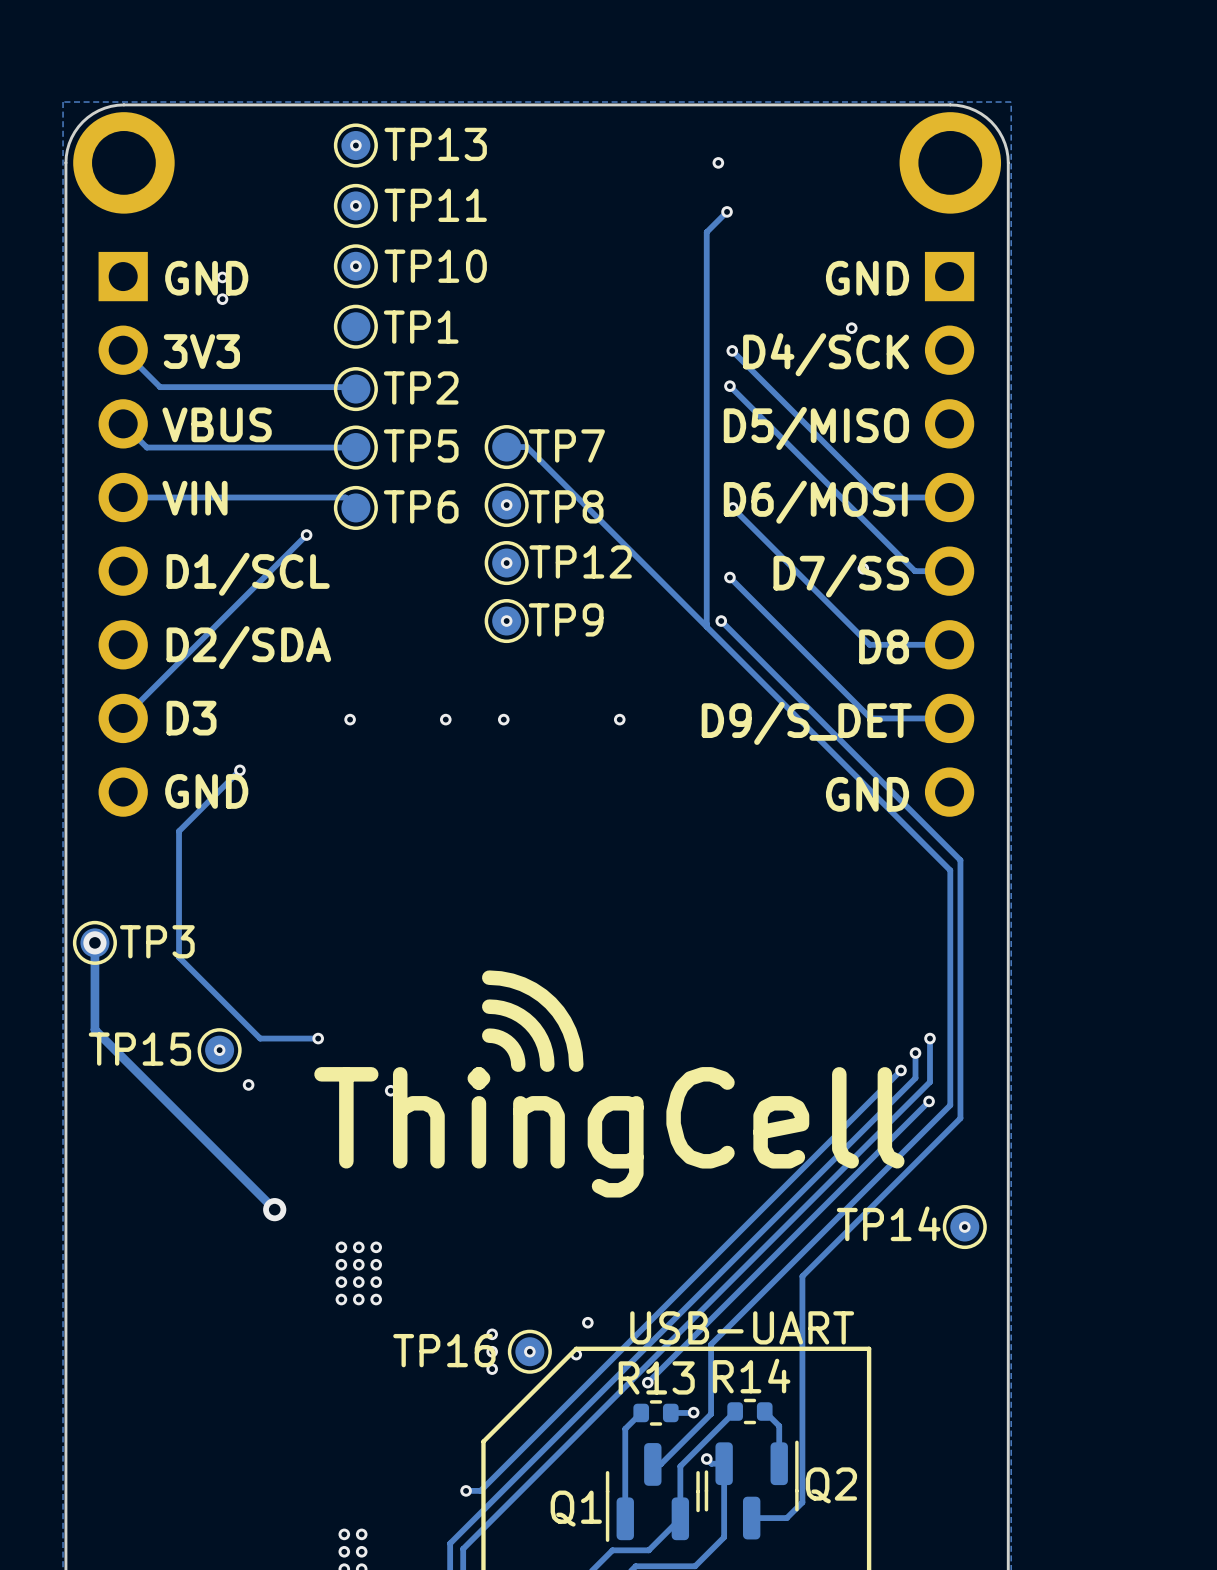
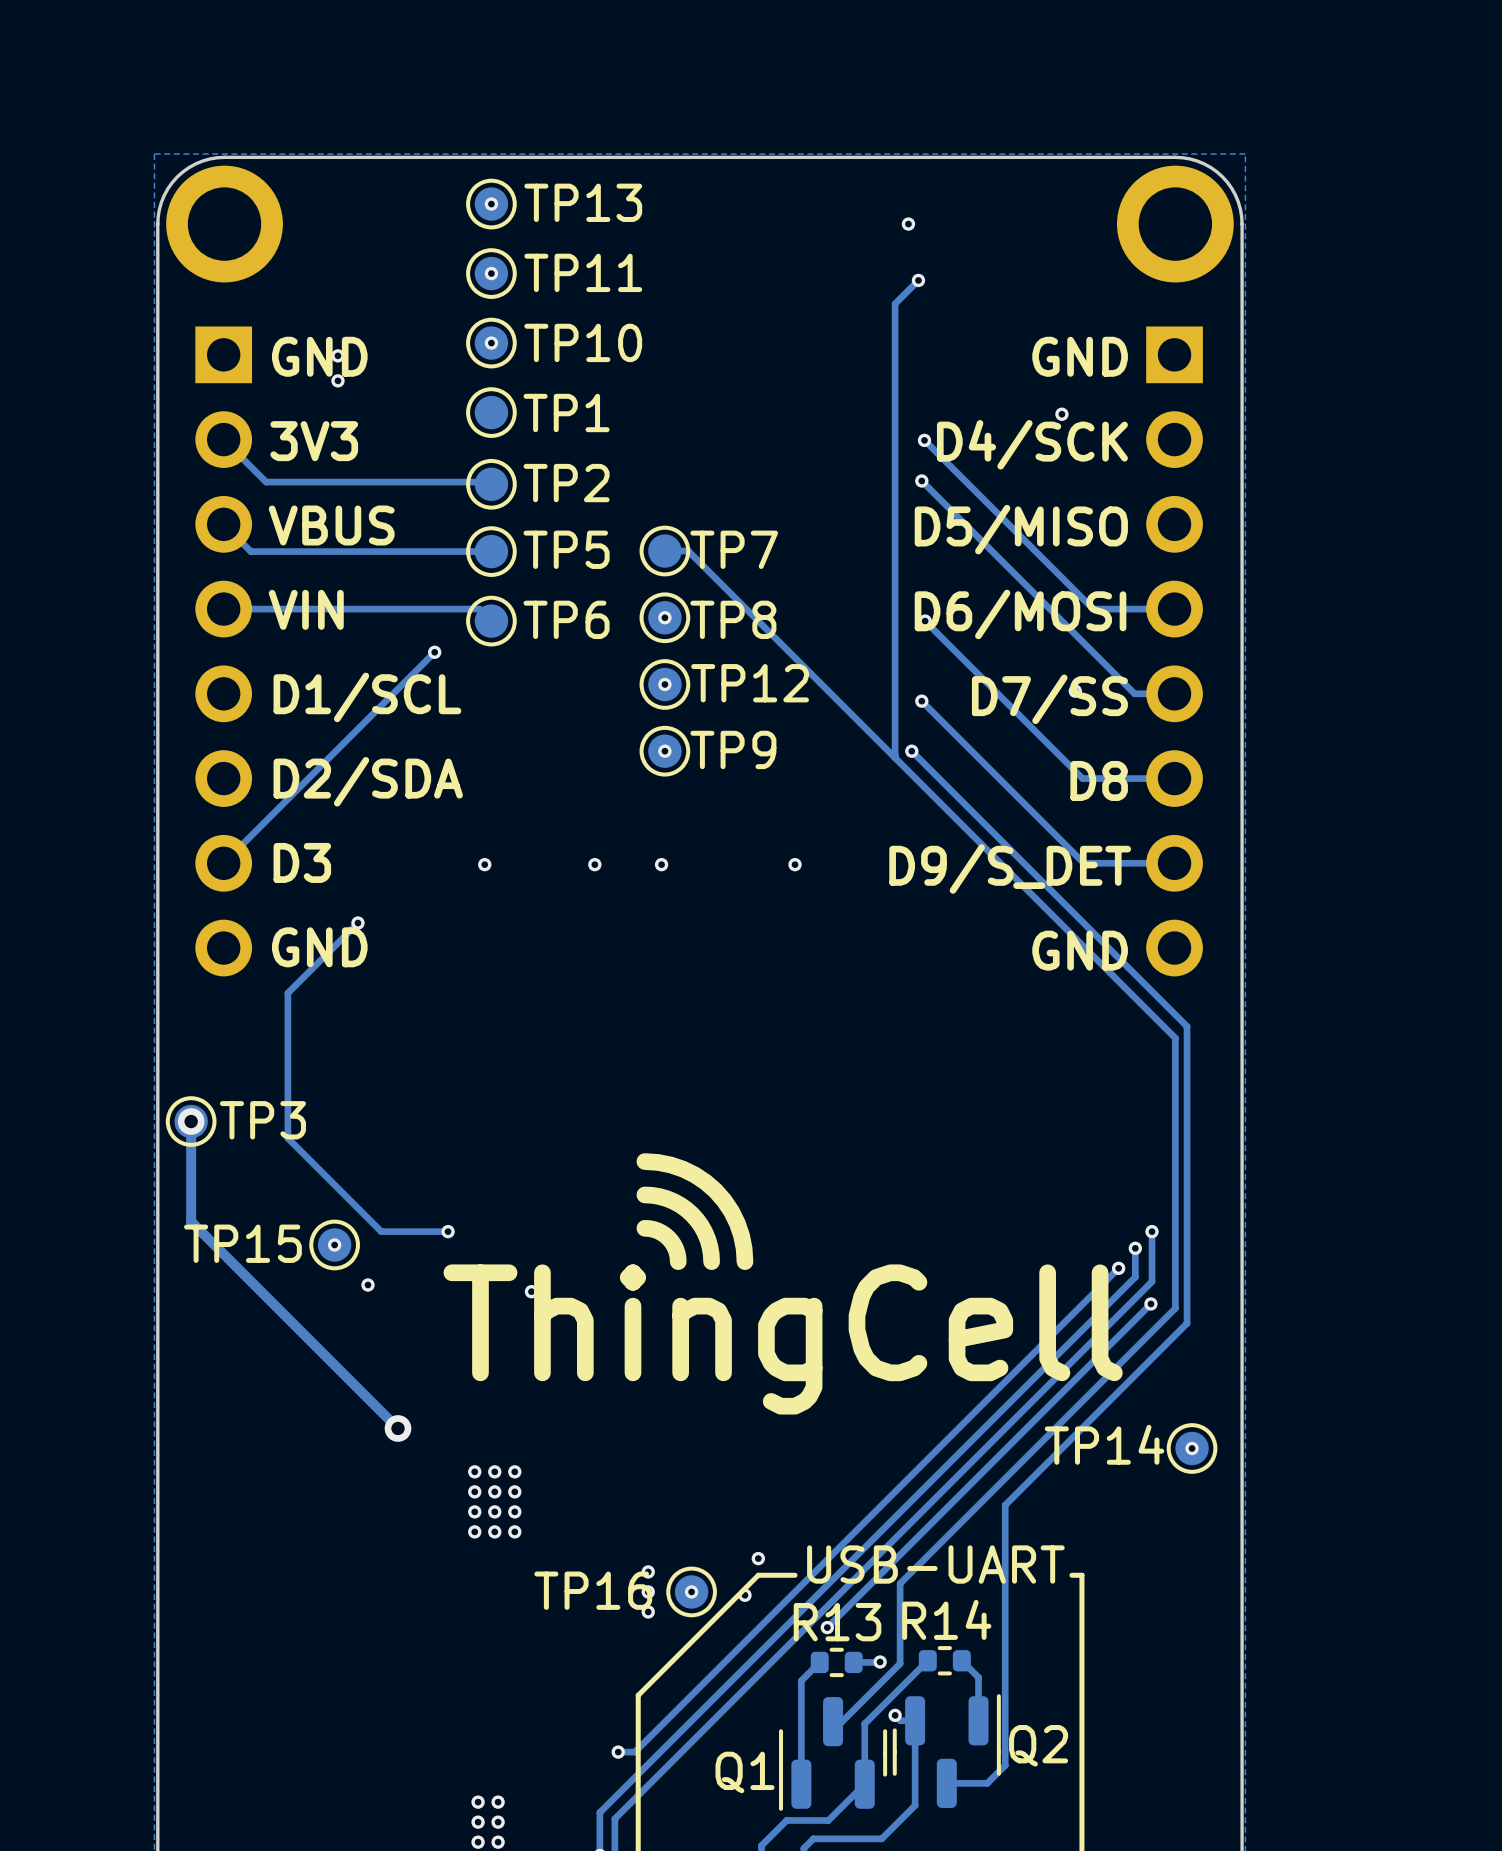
line: none -> (1071, 1575) (1081, 1575) (1081, 1588)
line: (869, 1348) (576, 1348) -> (795, 1575) (758, 1575) (744, 1588)

